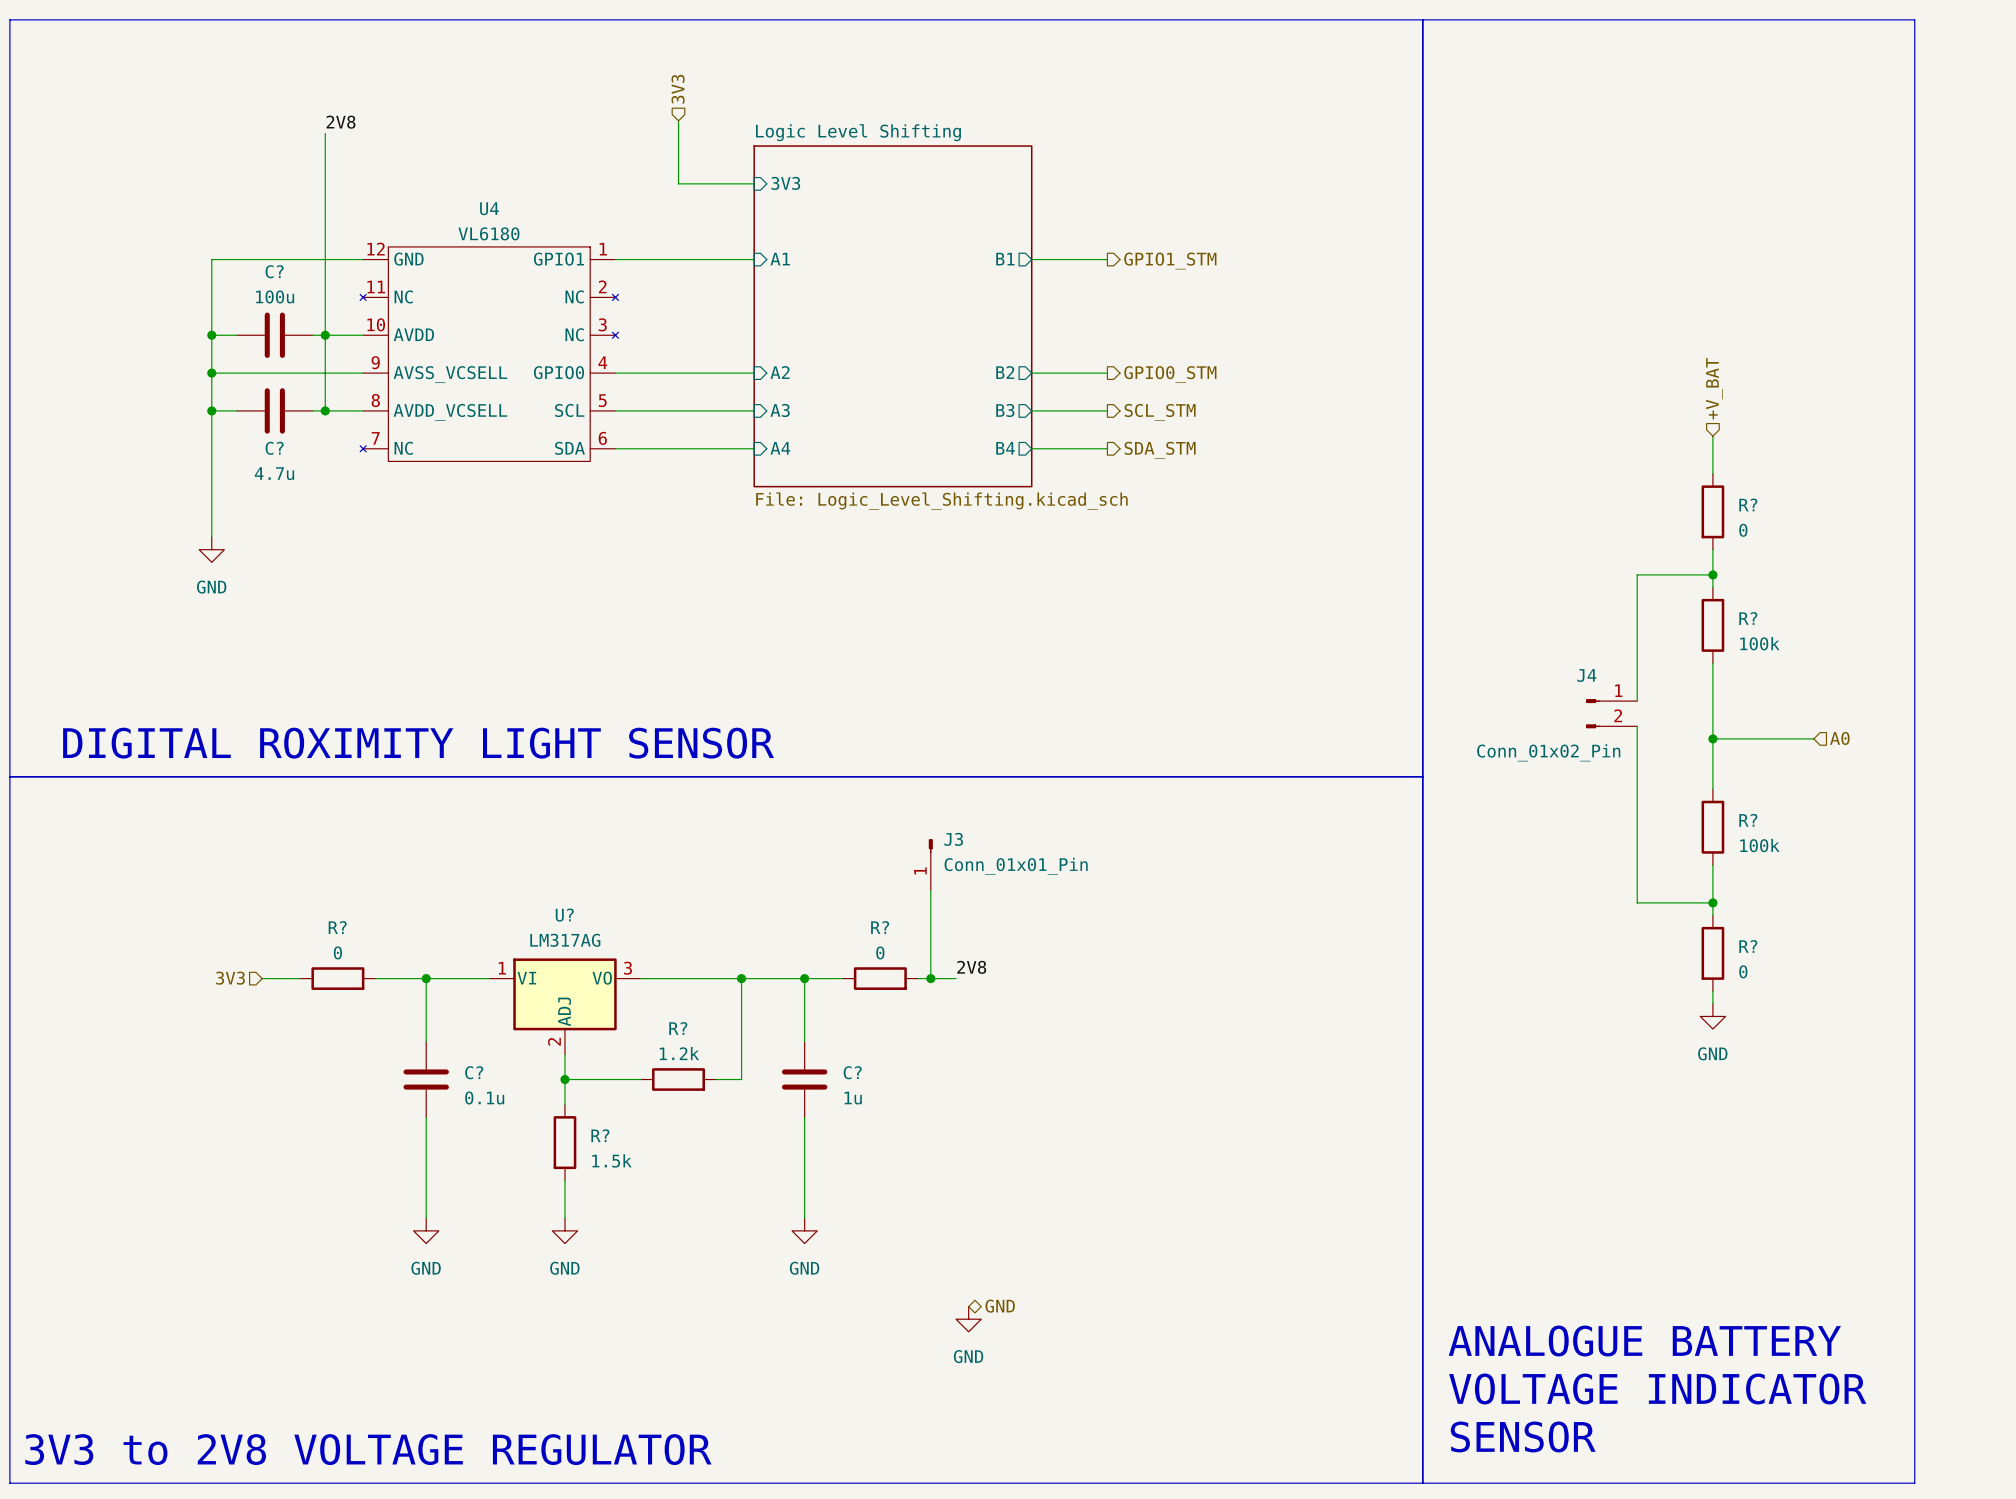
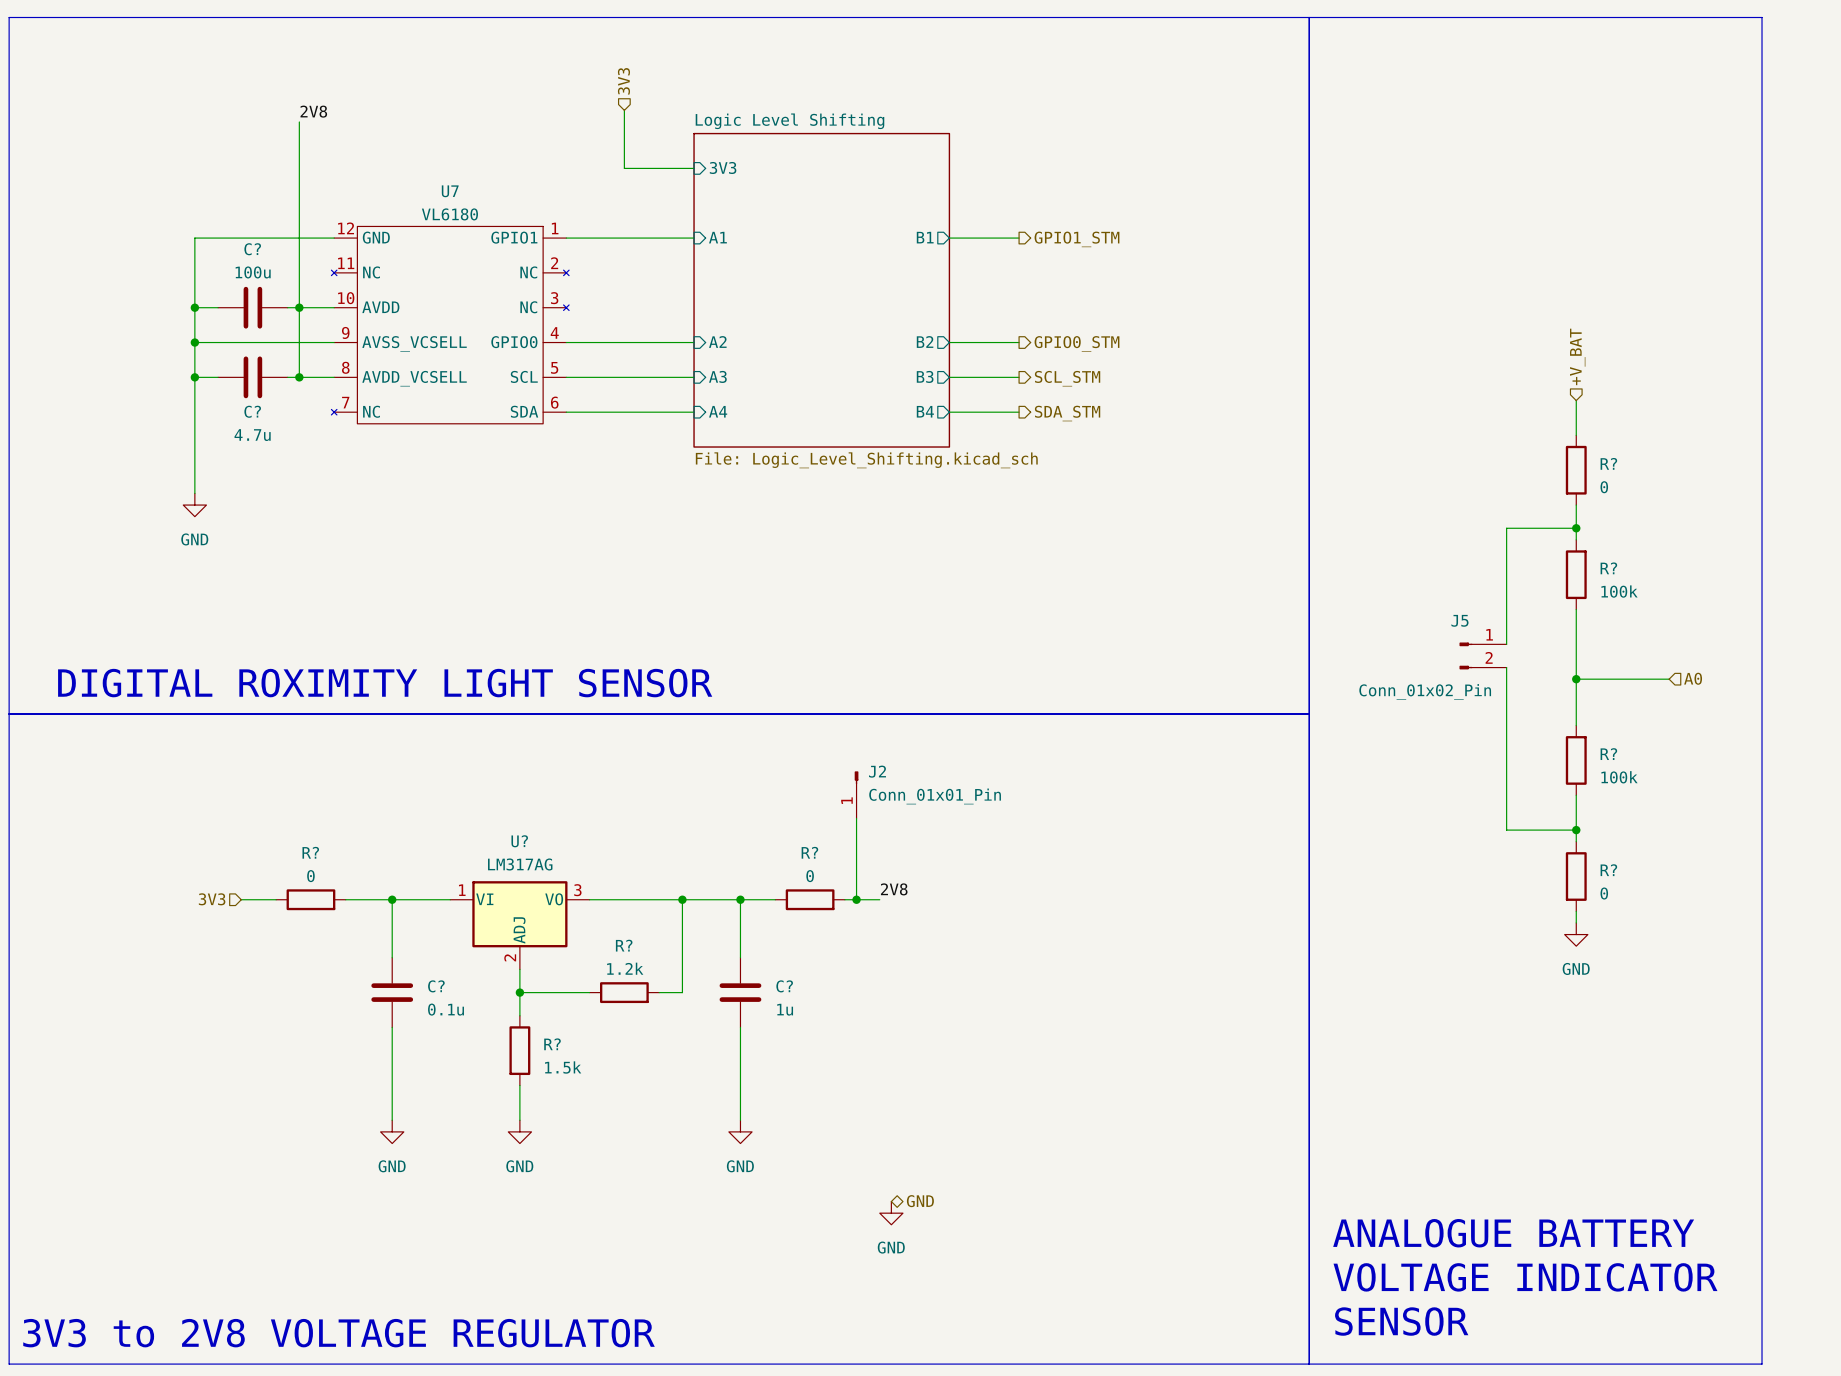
U4 name: U4 (489, 208) -> U7 (450, 191)
J4 name: J4 (1586, 675) -> J5 (1459, 620)
J3 name: J3 (953, 839) -> J2 (877, 771)

